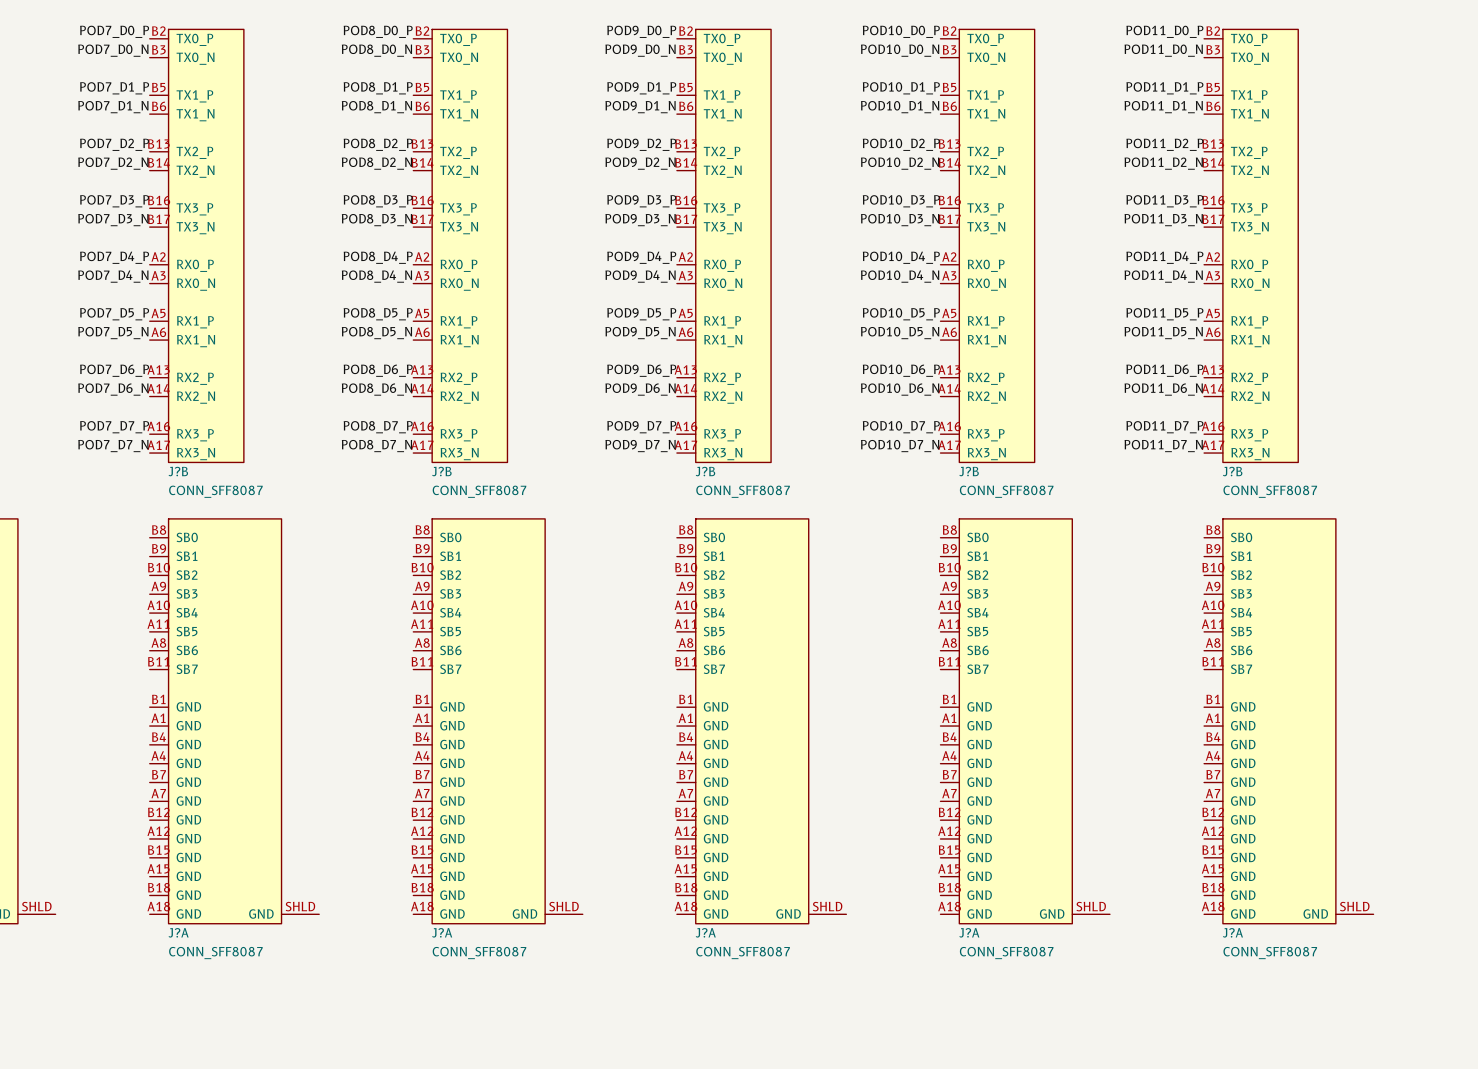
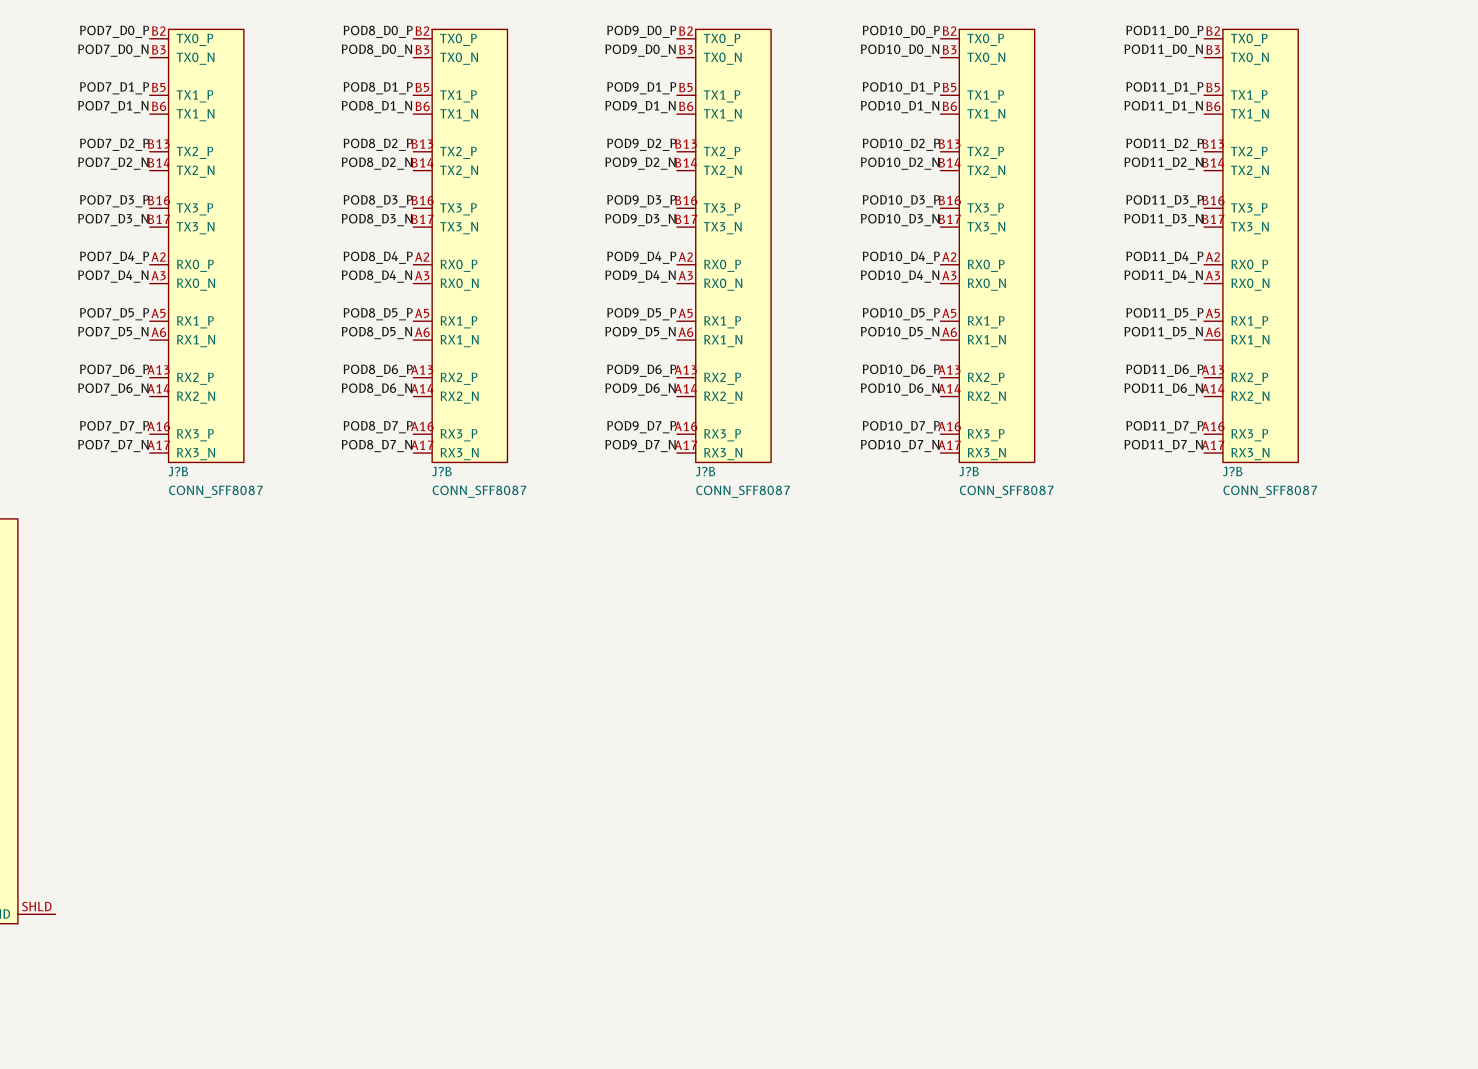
J?A: CONN_SFF8087 (234, 721) -> none
J?A: CONN_SFF8087 (498, 721) -> none
J?A: CONN_SFF8087 (761, 721) -> none
J?A: CONN_SFF8087 (1025, 721) -> none
J?A: CONN_SFF8087 (1288, 721) -> none

